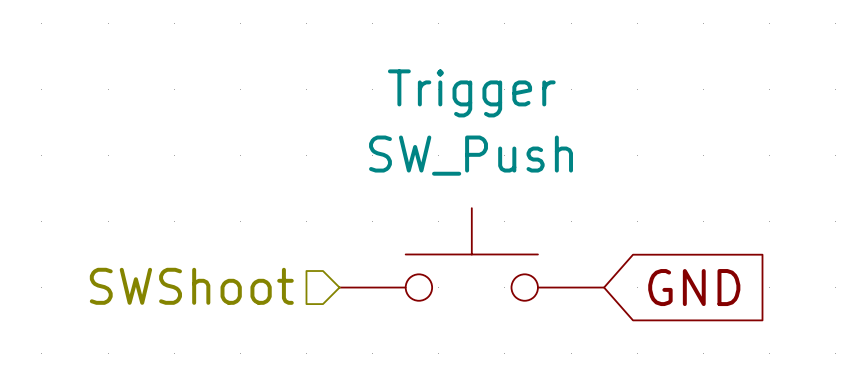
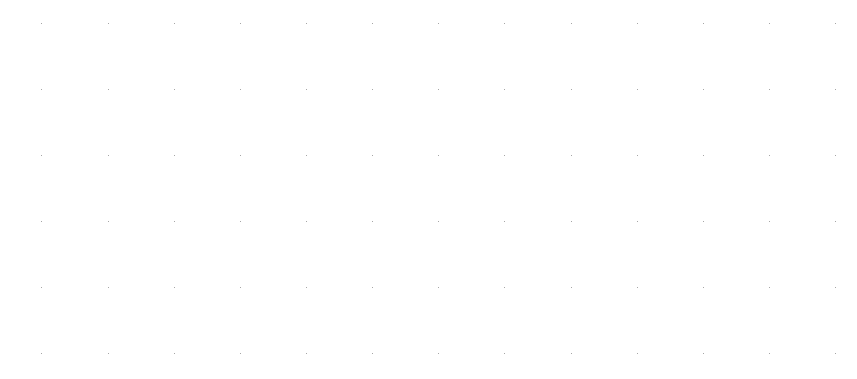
Trigger: SW_Push (471, 254) -> none
hierarchical label: SWShoot (191, 286) -> none
global label: GND (694, 287) -> none

